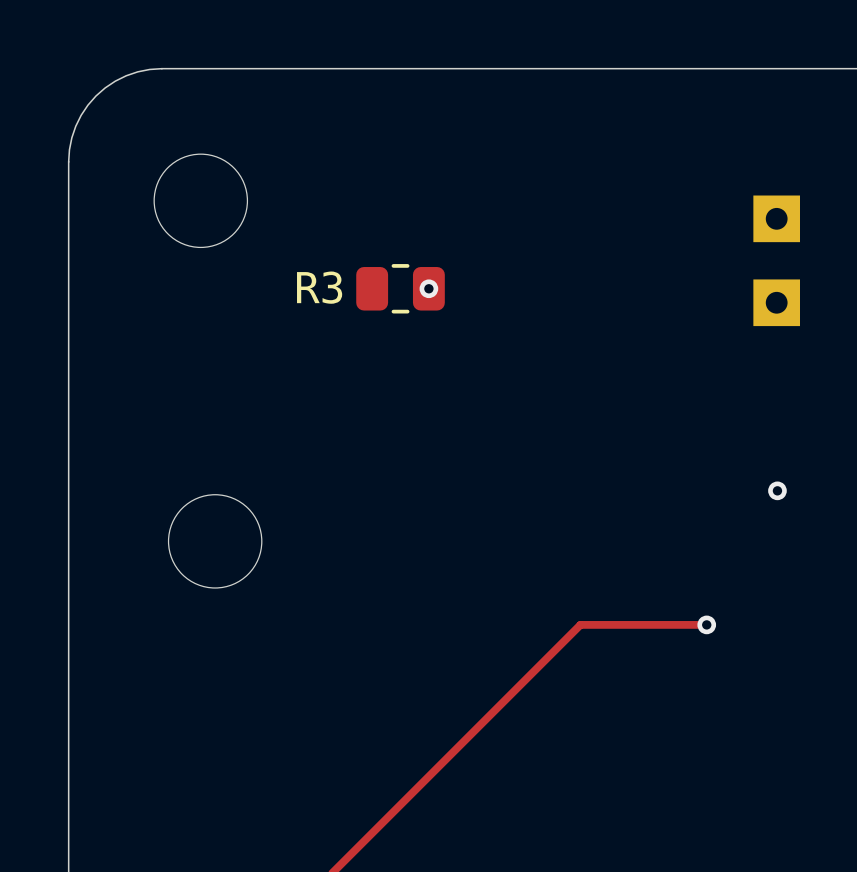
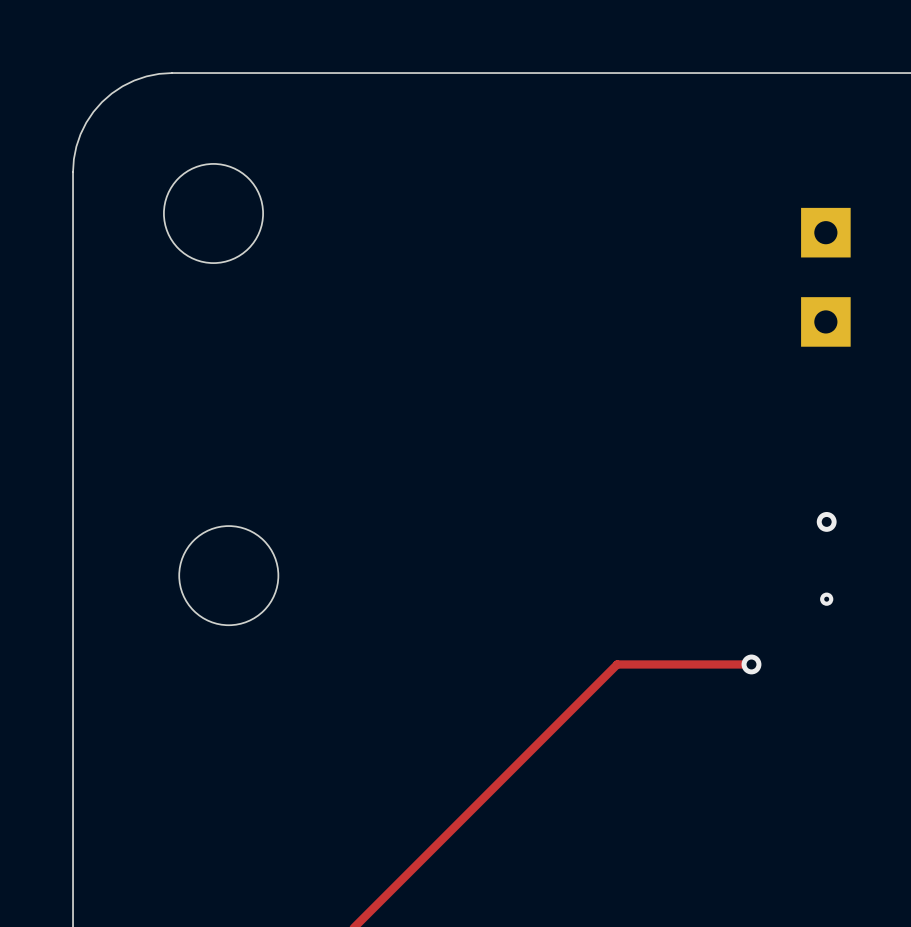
R3: (400, 288) -> none
via: (428, 288) -> none
via: none -> (826, 599)

